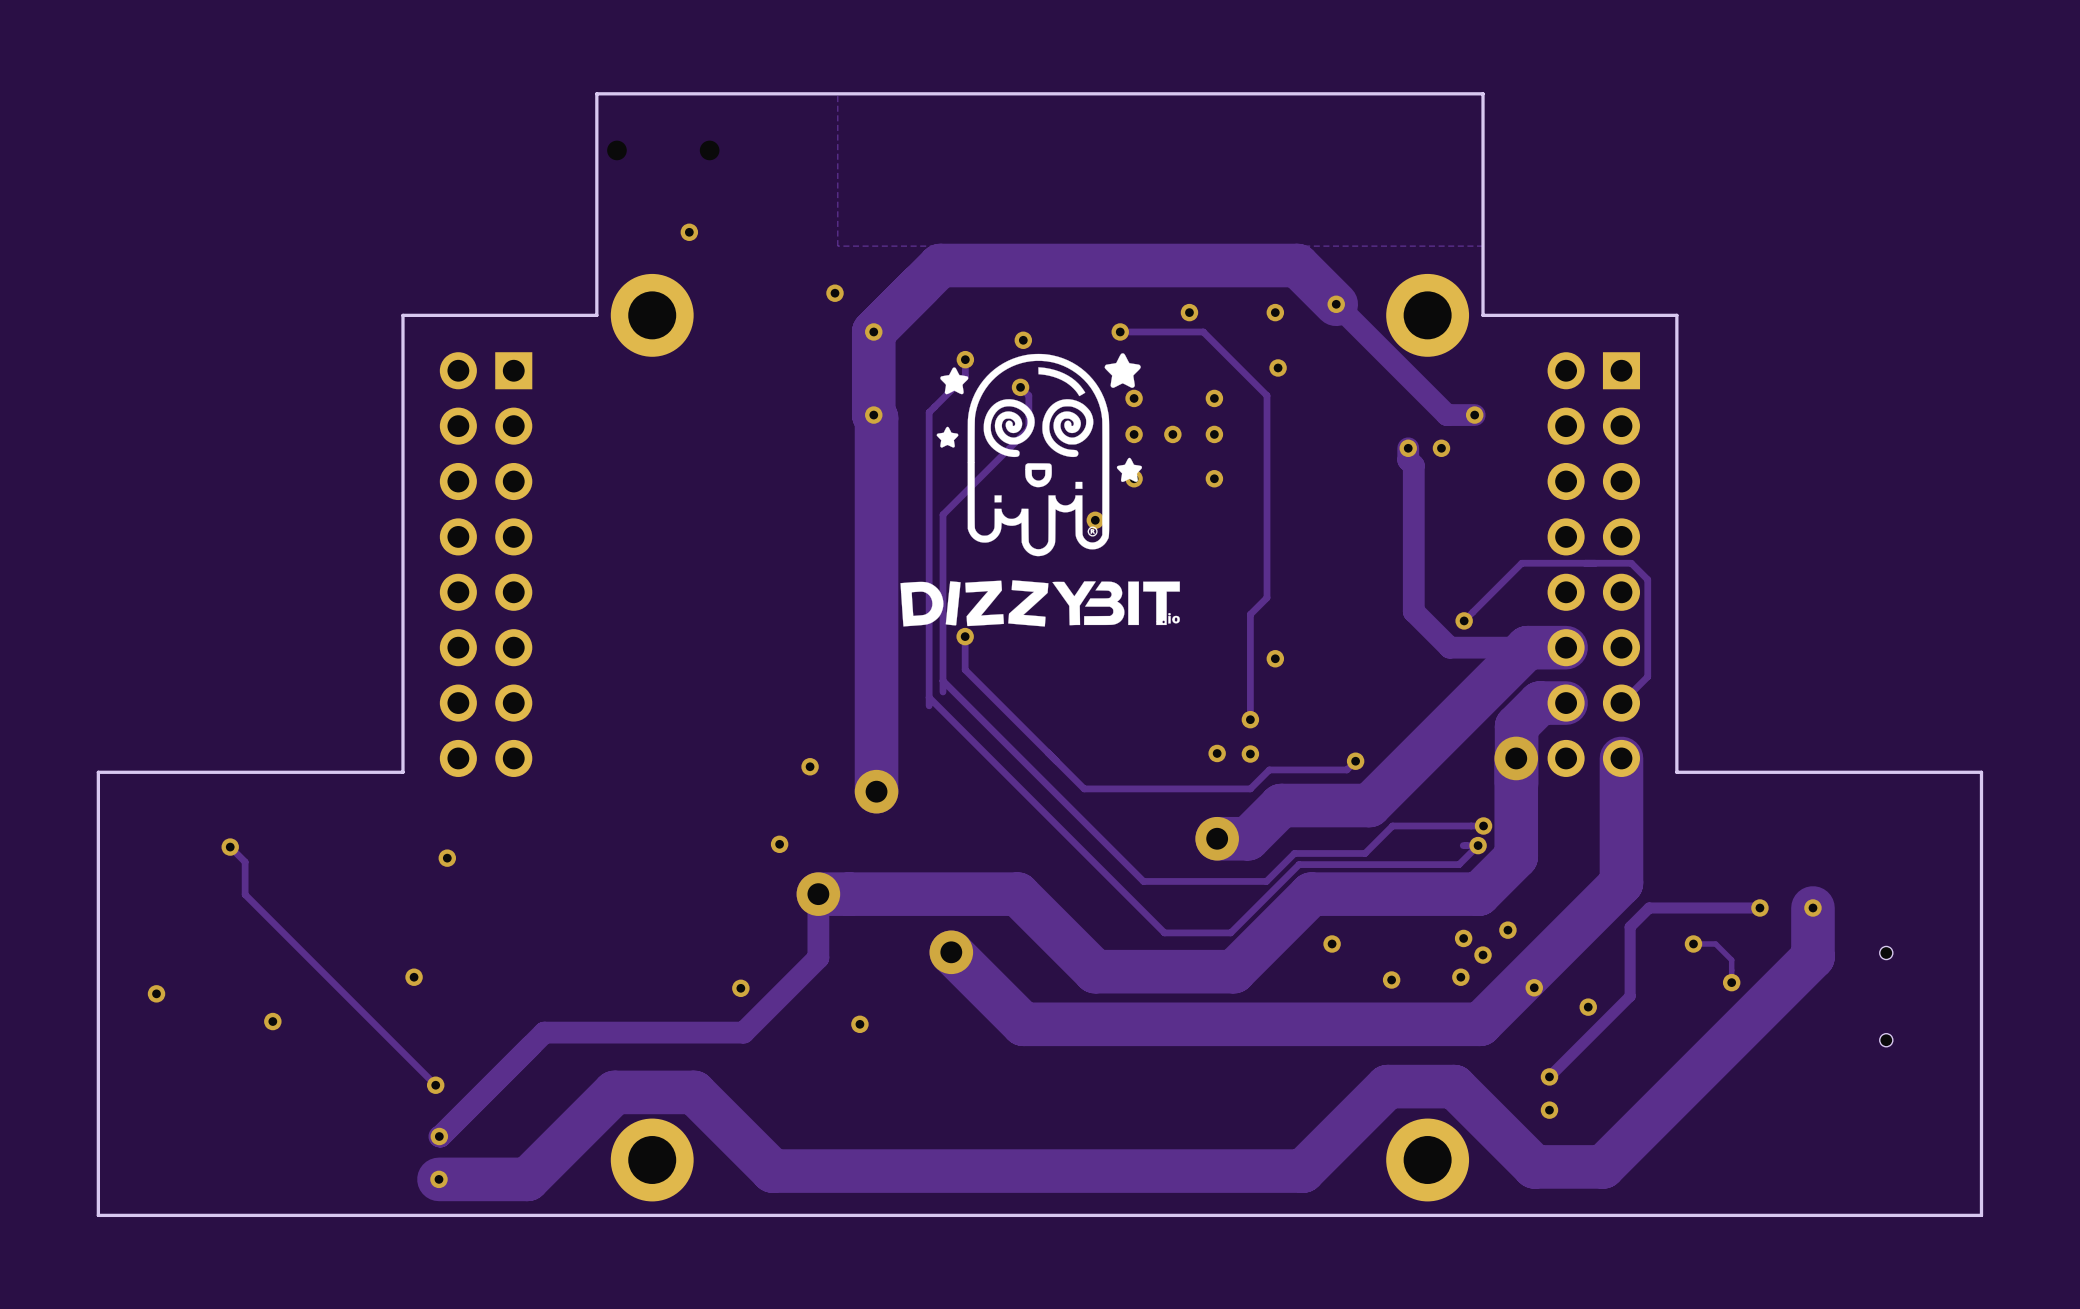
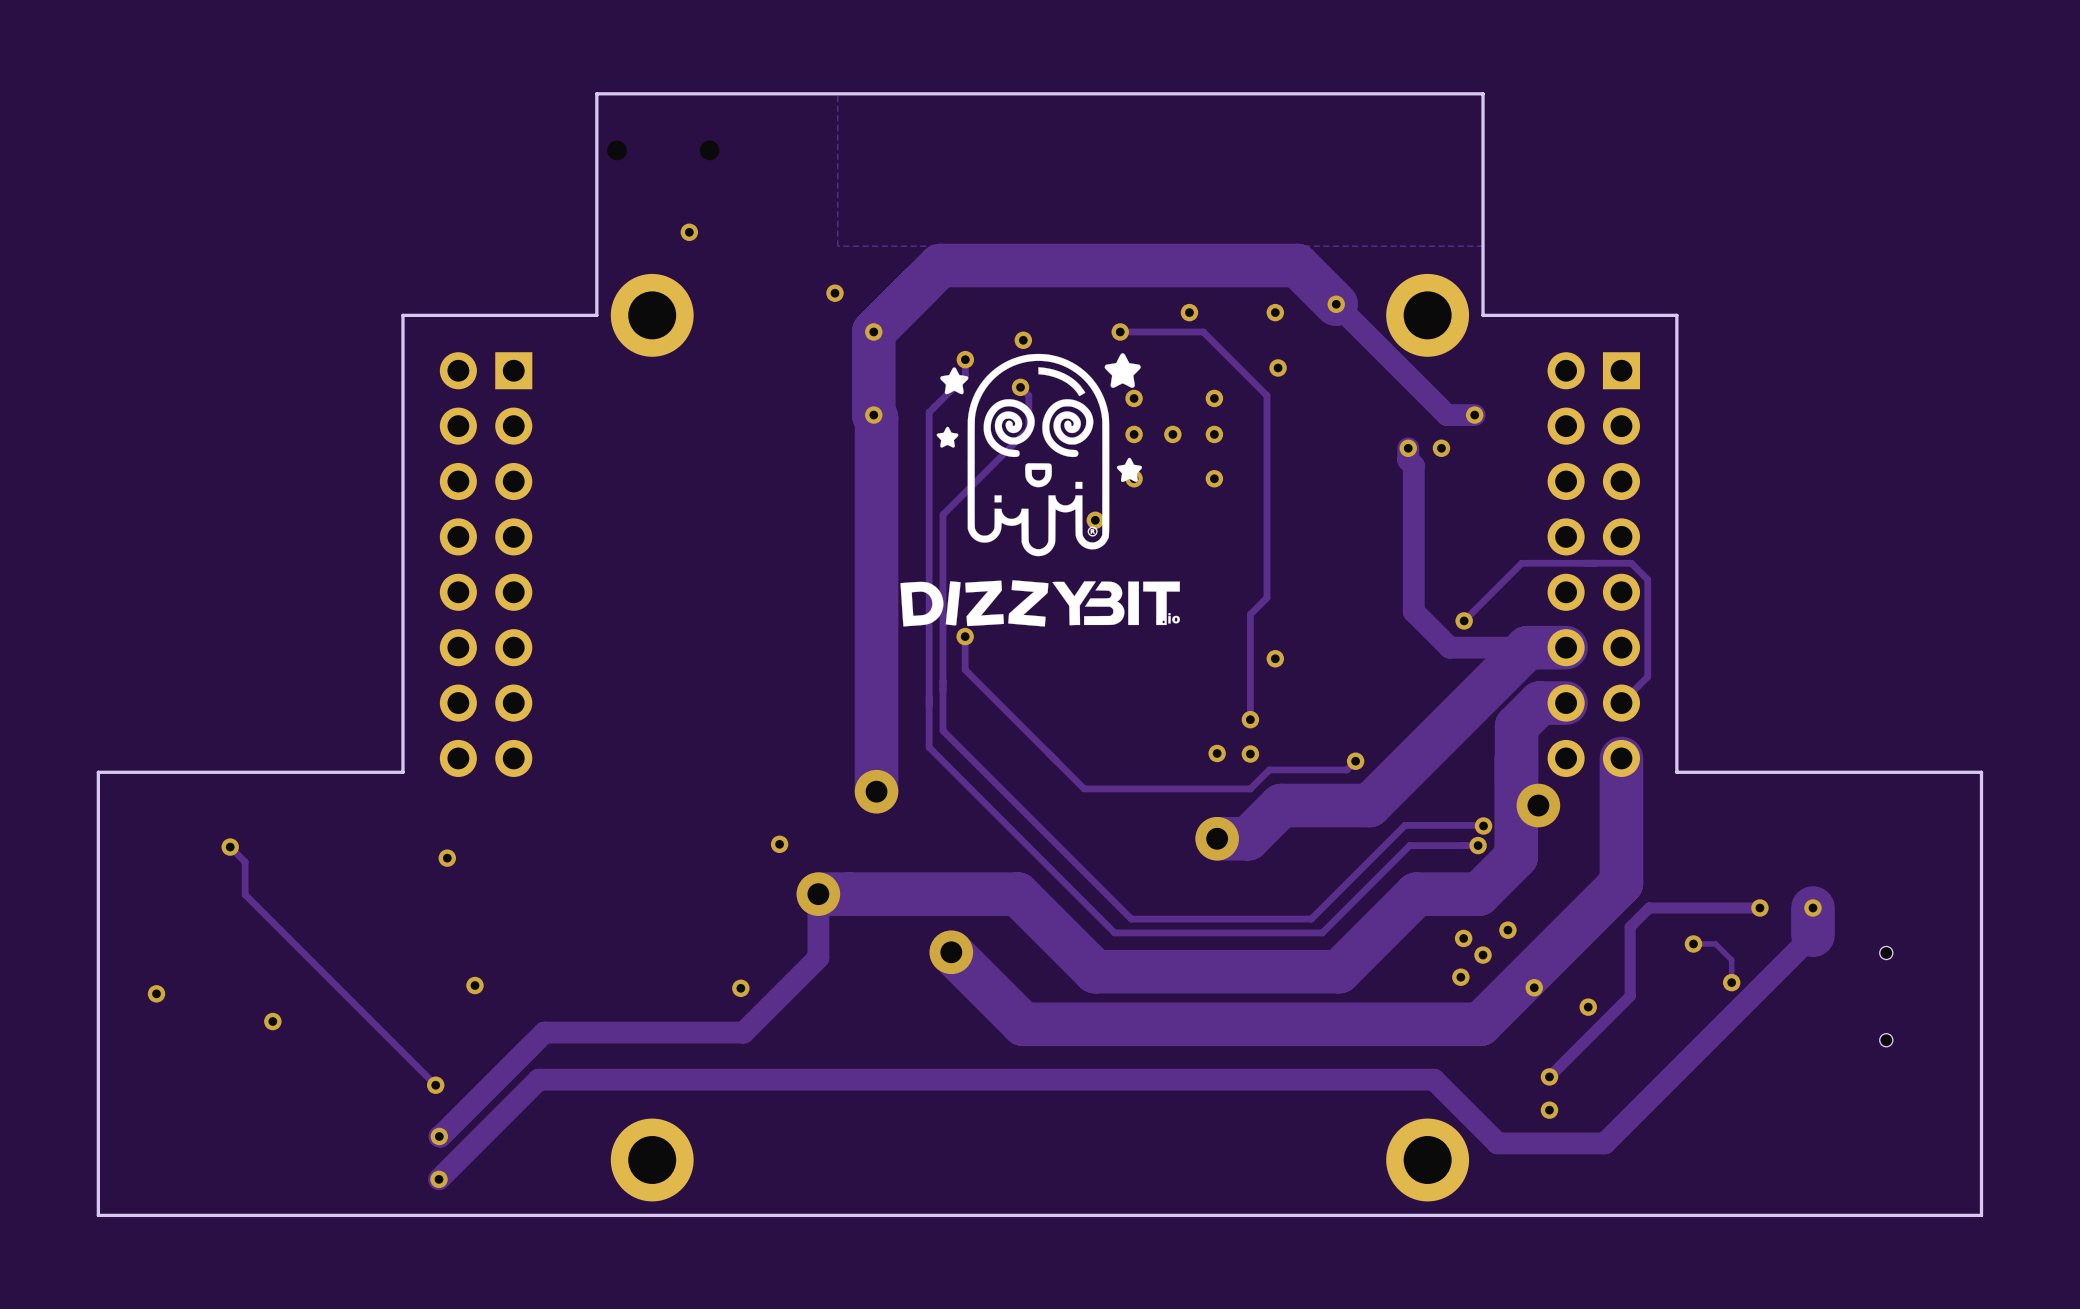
track: (943, 680) (1143, 881) (1266, 881) (1294, 853) (1365, 853) (1392, 825) (1483, 825) -> none
track: none -> (943, 691) (943, 730) (1131, 919) (1311, 919) (1405, 825) (1486, 825)
track: (929, 697) (1164, 932) -> (929, 705) (929, 747) (1114, 932) (1164, 932)
via position: (1516, 758) -> (1538, 805)
via: (810, 766) -> none
track: (1478, 845) (1459, 864) (1299, 864) (1230, 932) -> (1463, 845) (1409, 845) (1322, 932) (1230, 932)
track: (1416, 894) (1311, 894) (1233, 971) -> (1416, 894) (1339, 971) (1233, 971)
track: (1812, 935) (1812, 957) (1603, 1166) (1534, 1166) (1454, 1086) (1387, 1086) (1303, 1171) (772, 1171) (694, 1092) (614, 1092) (527, 1179) (438, 1179) -> (1812, 935) (1604, 1143) (1497, 1143) (1433, 1079) (538, 1079) (438, 1179)
via: (1332, 943) -> none
via position: (414, 977) -> (474, 985)
via: (1391, 979) -> none
via: (859, 1024) -> none

